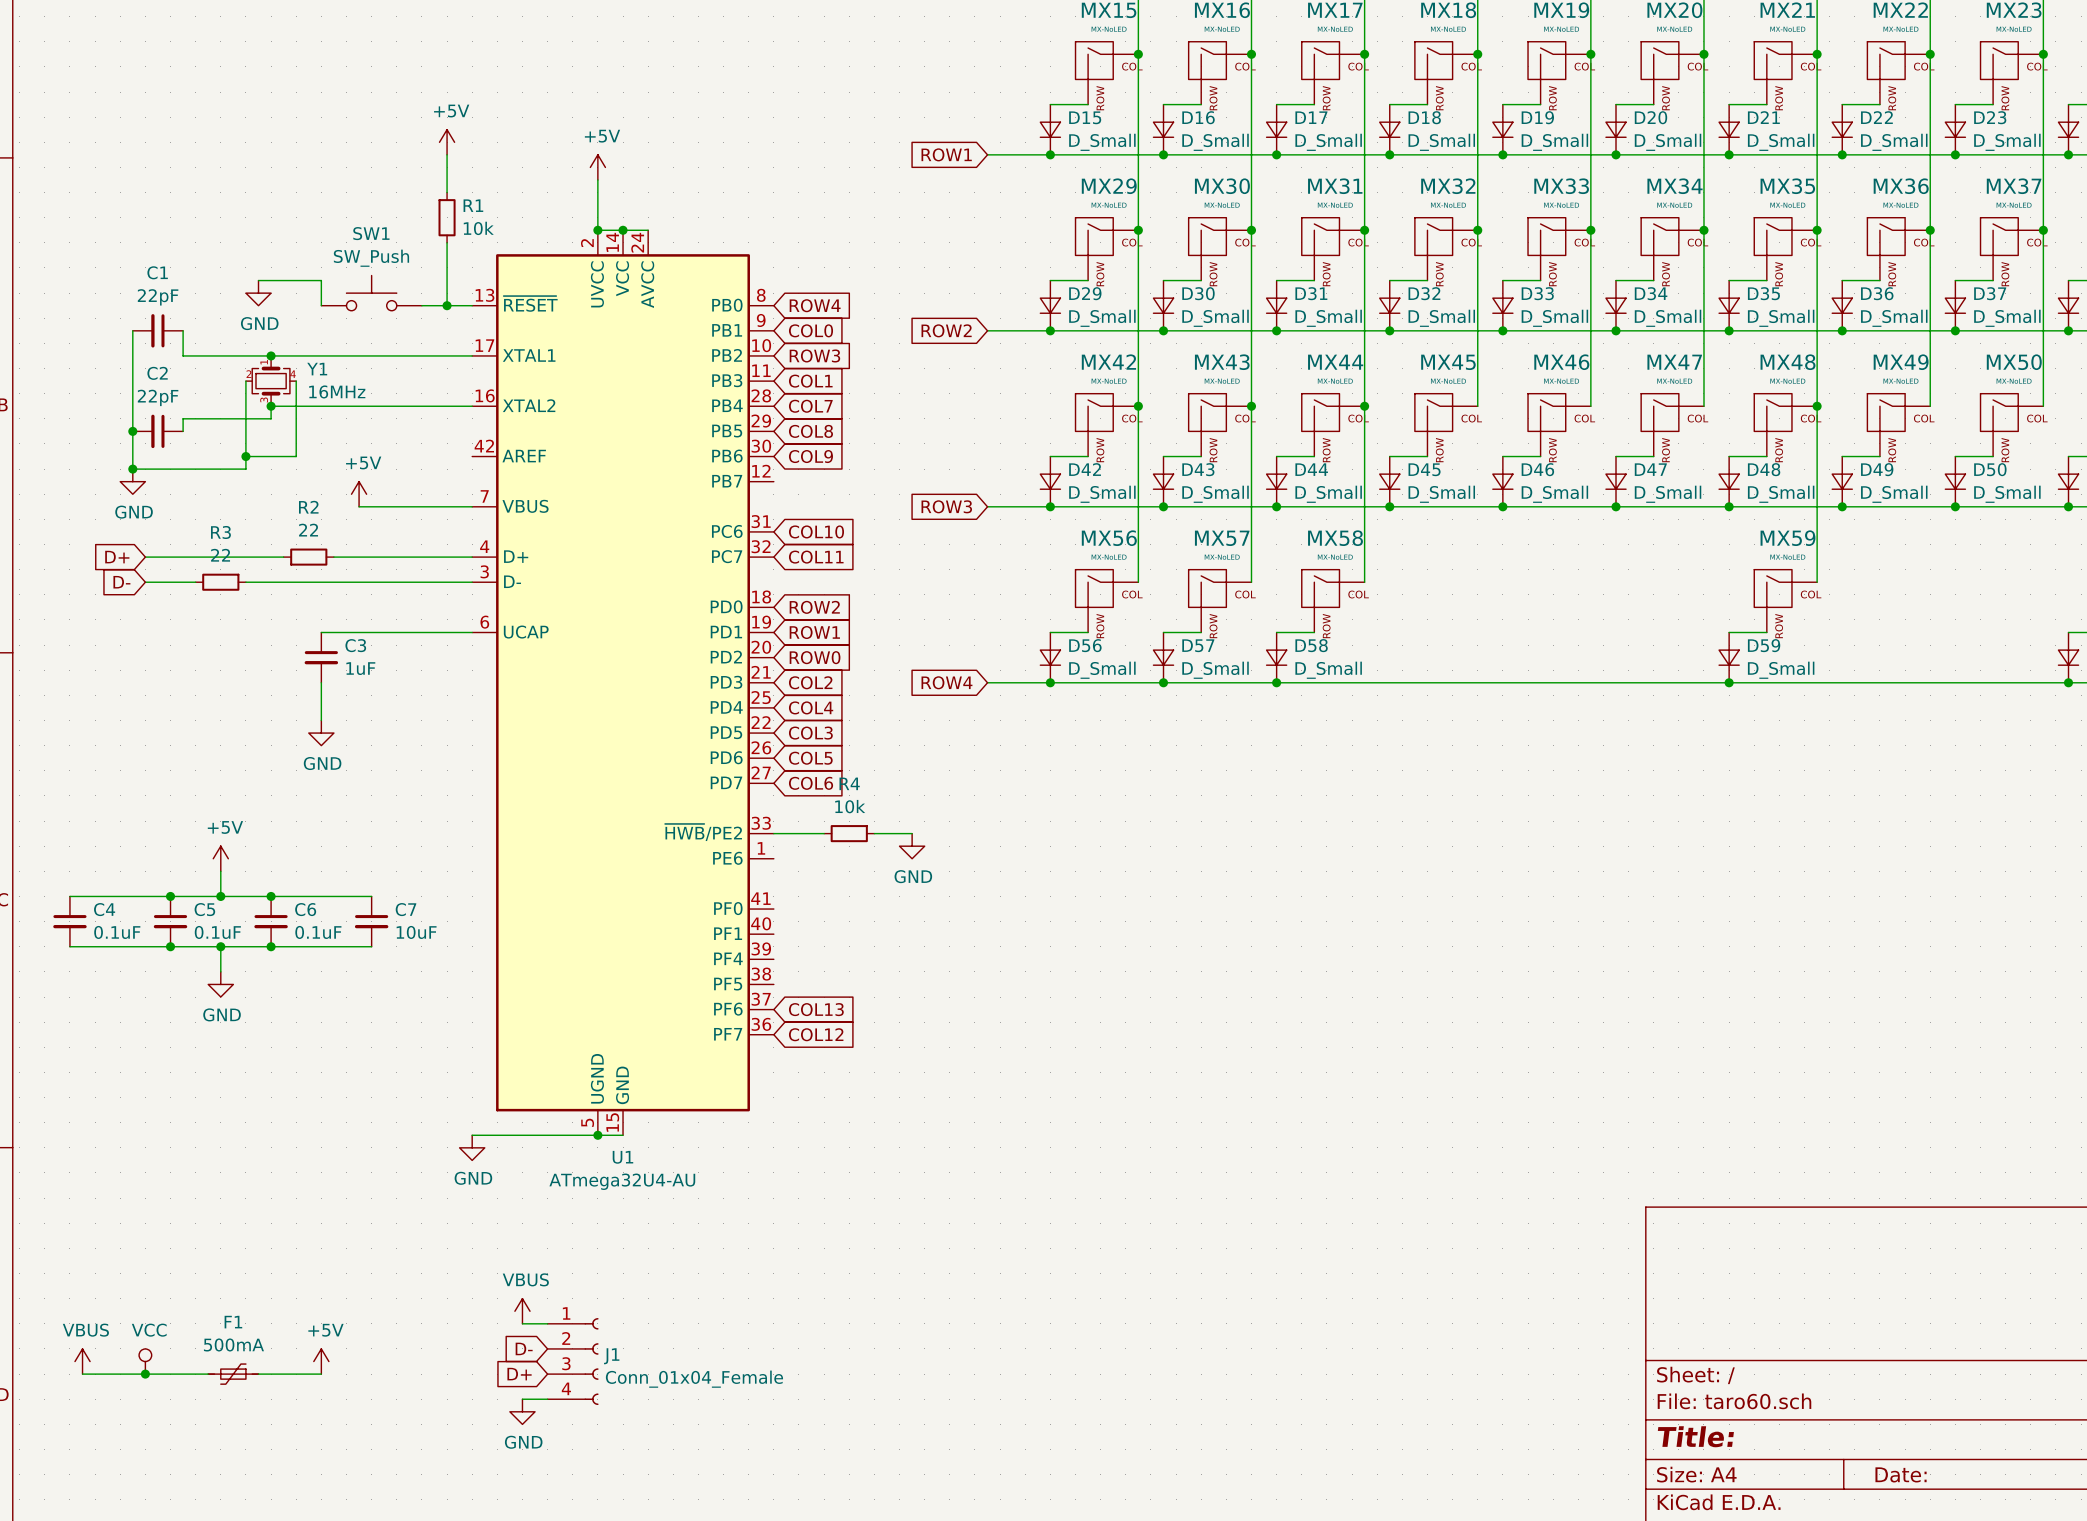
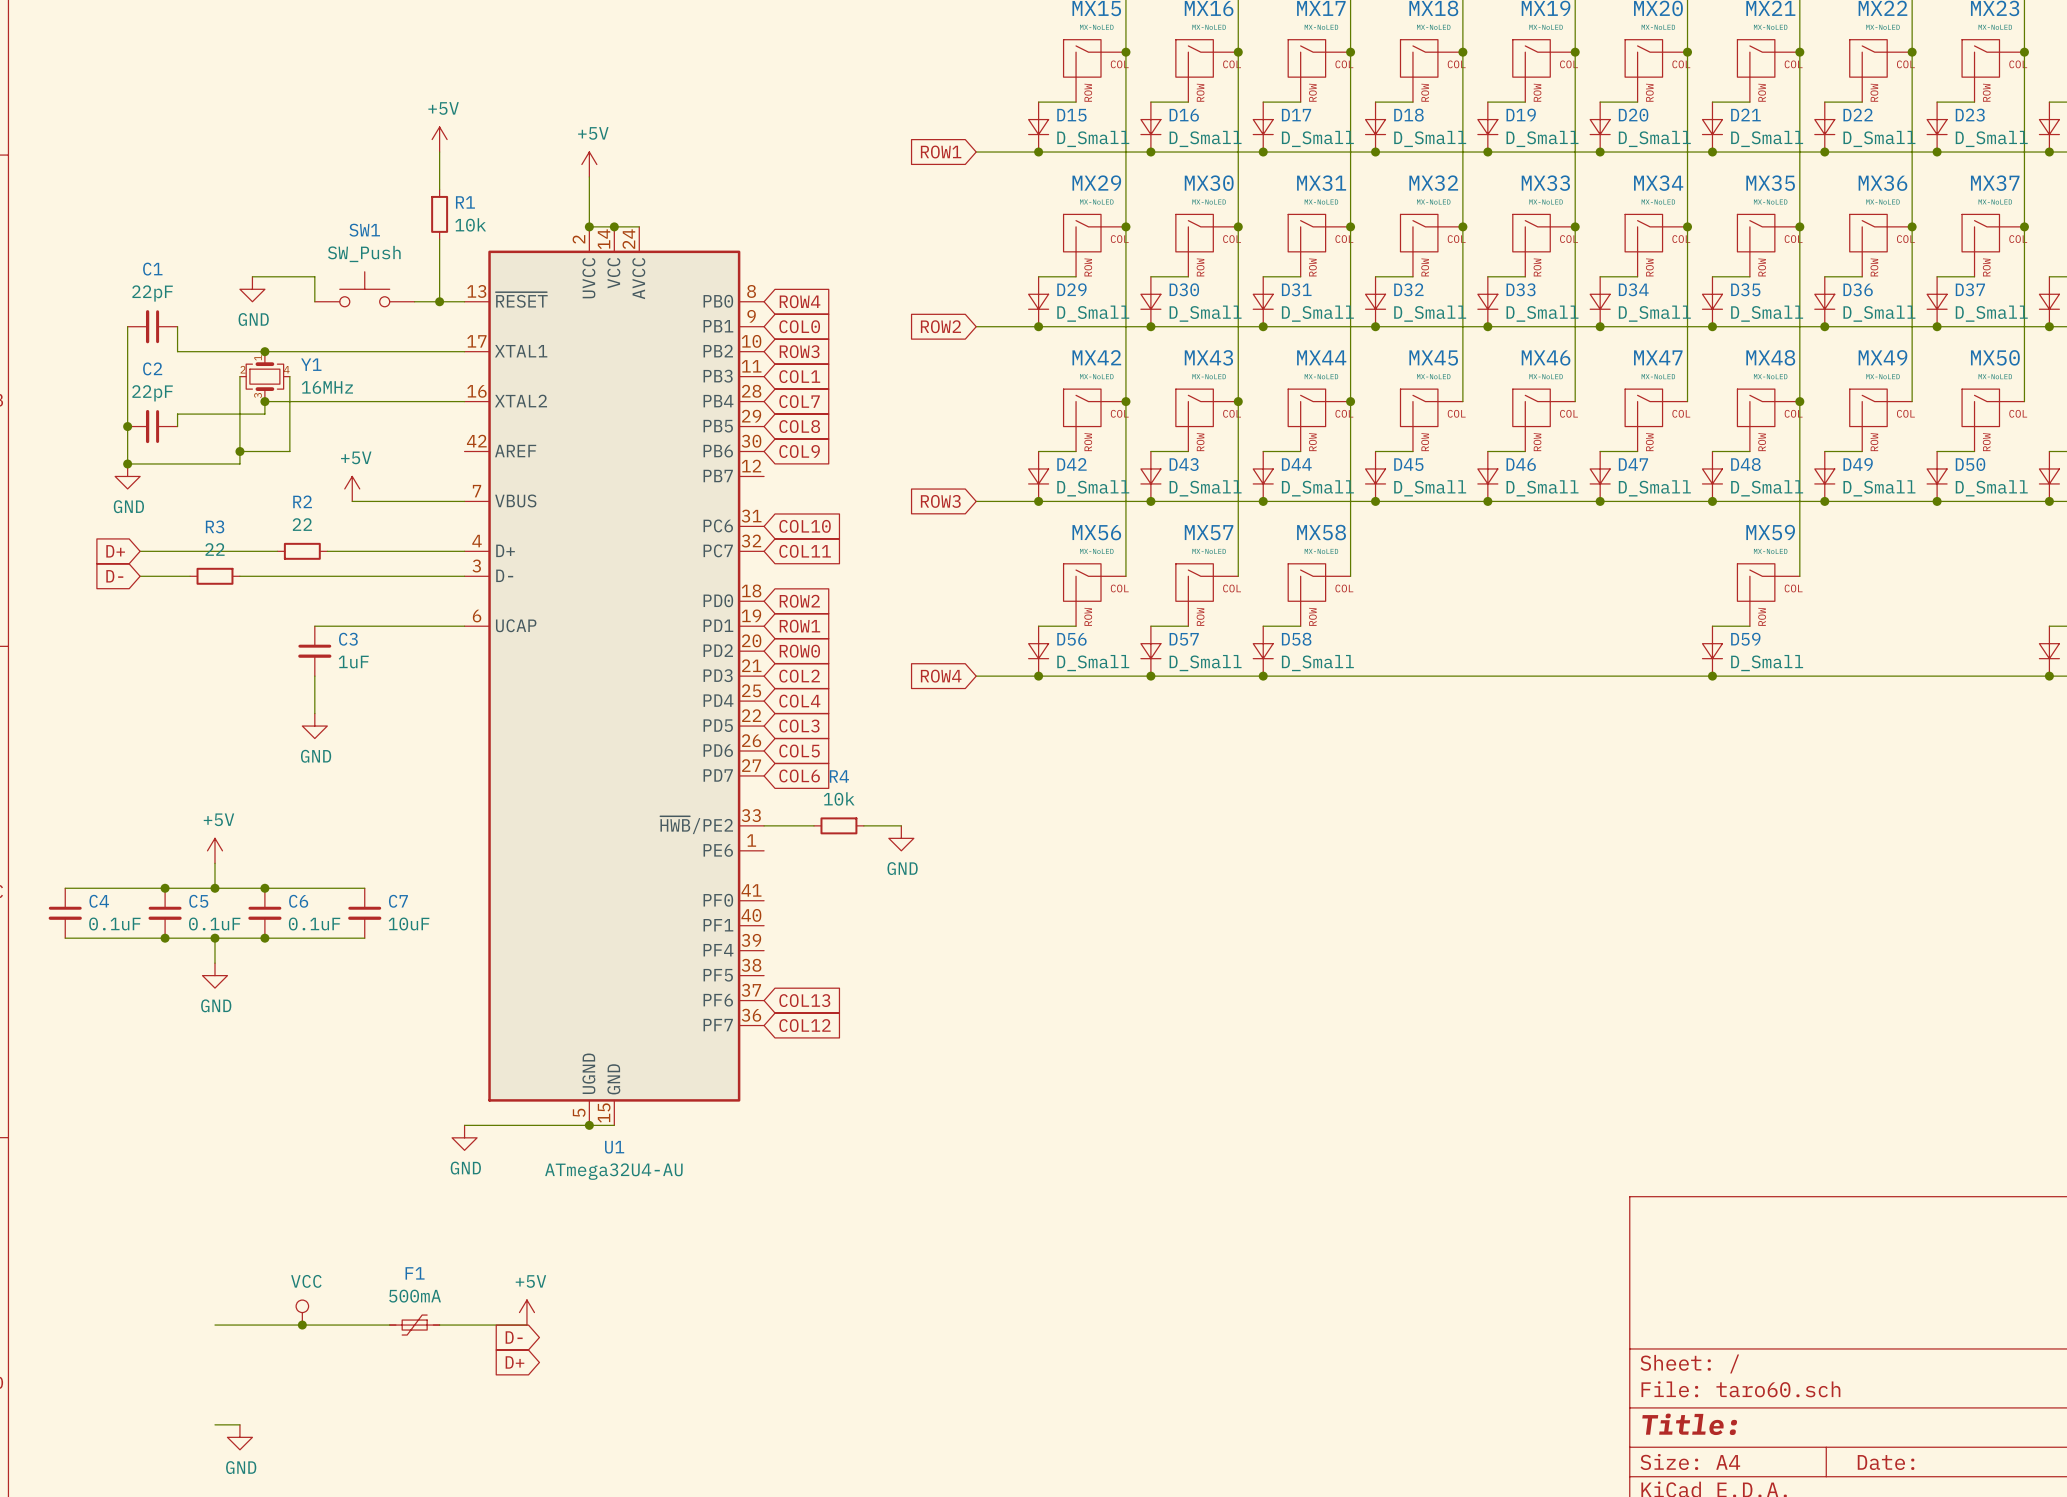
power symbol: VBUS (522, 1311) -> none
wire: (522, 1323) (547, 1323) -> none
wire: none -> (214, 1325) (389, 1325)
junction: none -> (302, 1325)
wire: none -> (439, 1325) (526, 1325)
power symbol: VBUS (82, 1361) -> none
power symbol position: VCC (145, 1361) -> VCC (302, 1312)
power symbol position: +5V (321, 1361) -> +5V (526, 1312)
J1: Conn_01x04_Female (573, 1361) -> none
wire: (82, 1374) (208, 1374) -> none
junction: (145, 1374) -> none
F1 position: (233, 1374) -> (414, 1325)
wire: (258, 1374) (321, 1374) -> none
wire: (522, 1399) (547, 1399) -> none
power symbol: GND (522, 1411) -> none
wire: none -> (214, 1424) (239, 1424)
power symbol: none -> GND (239, 1437)

